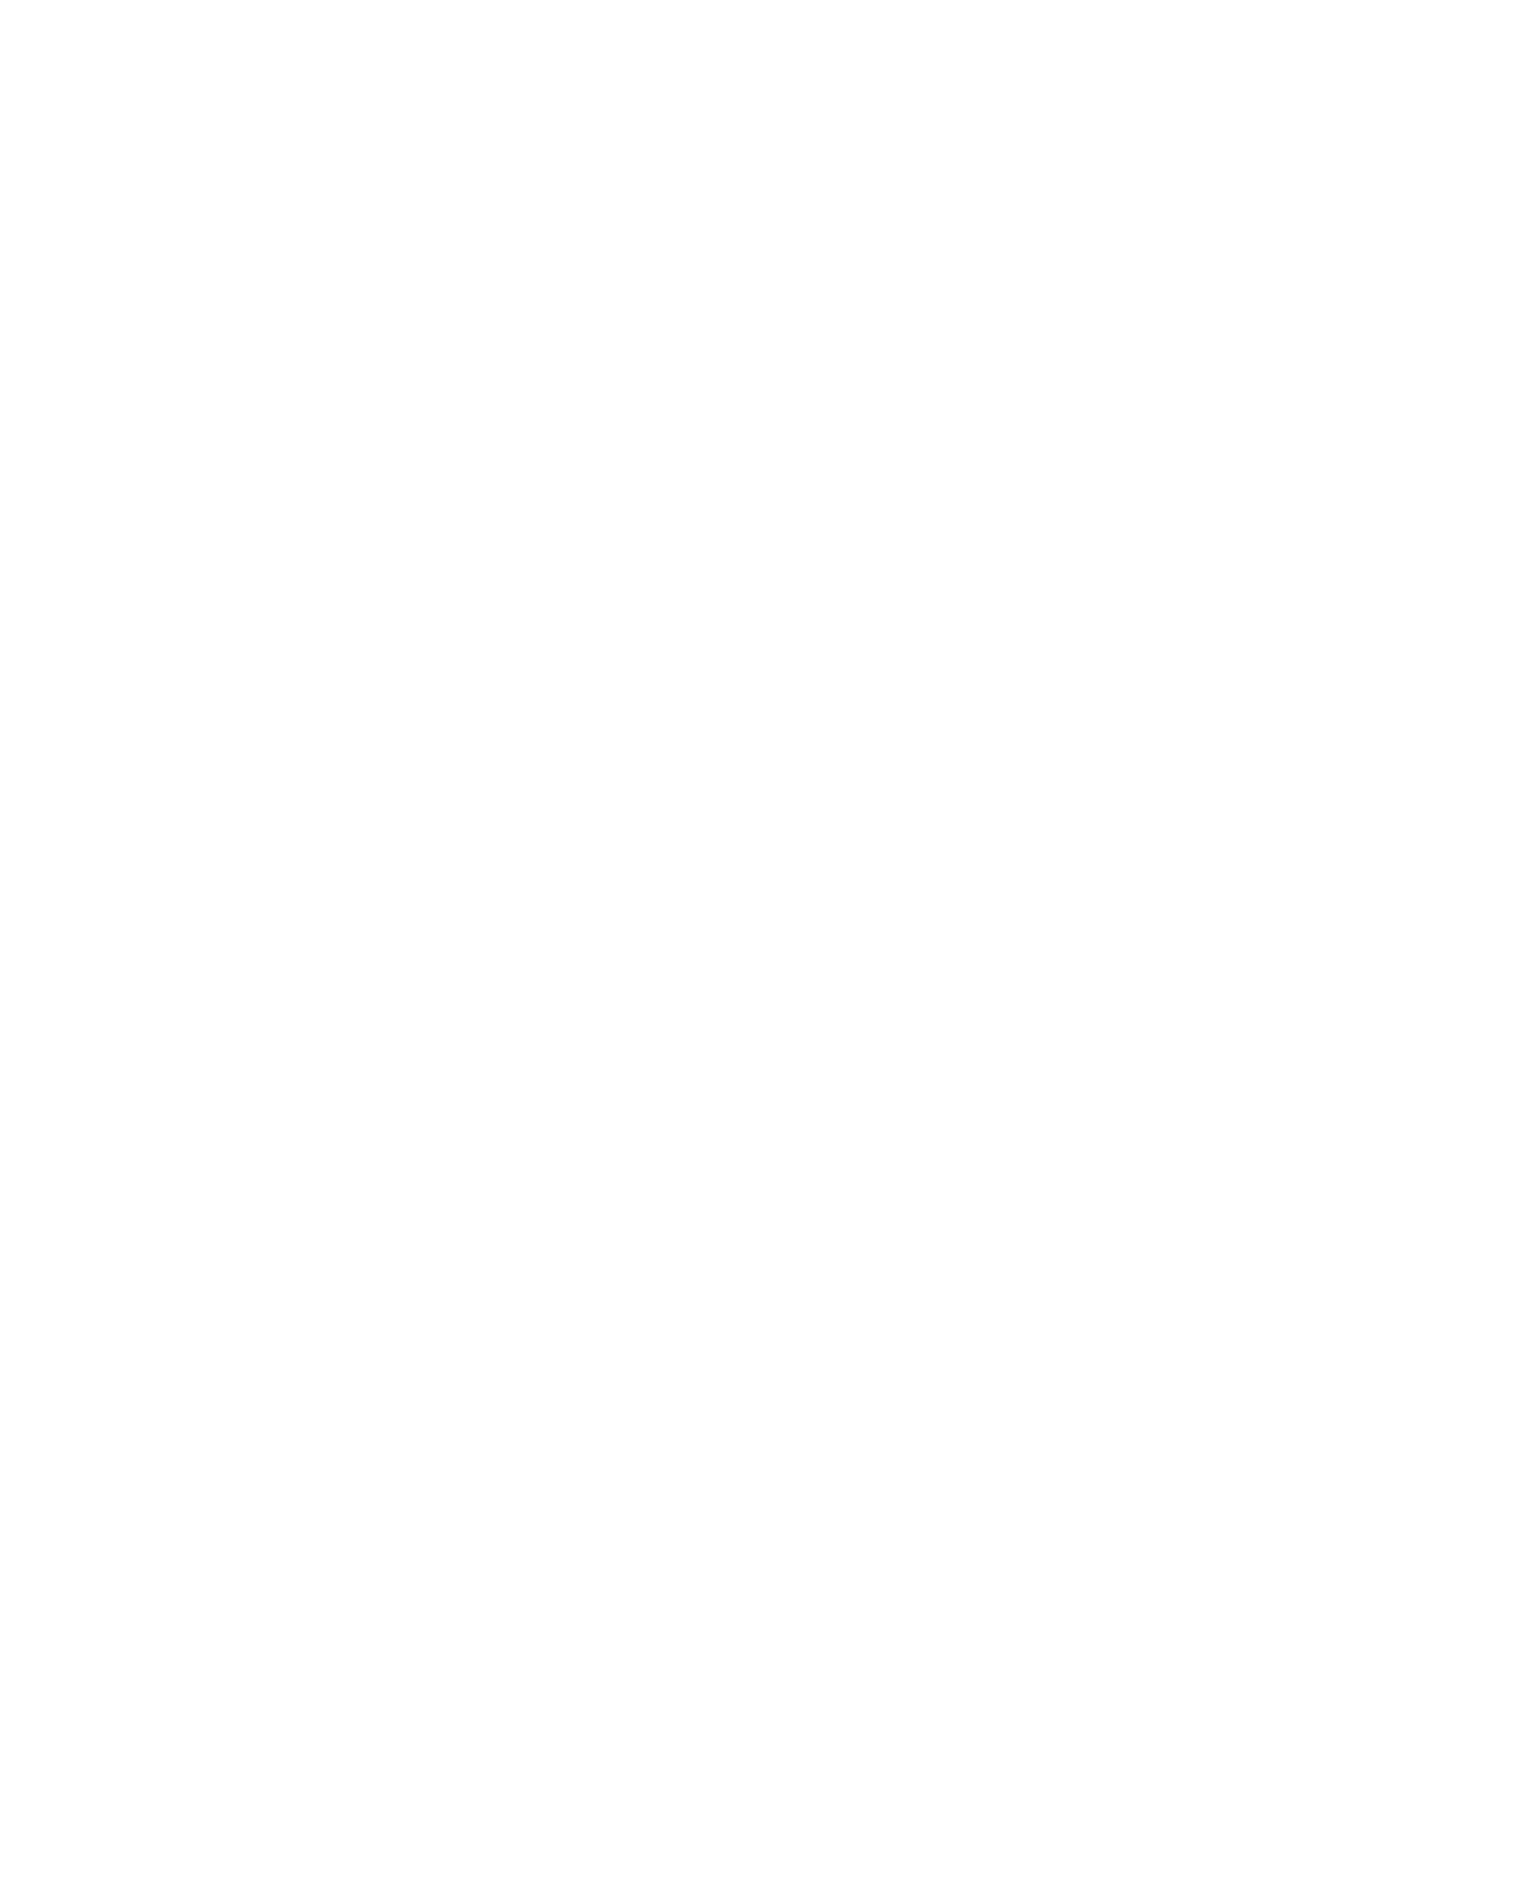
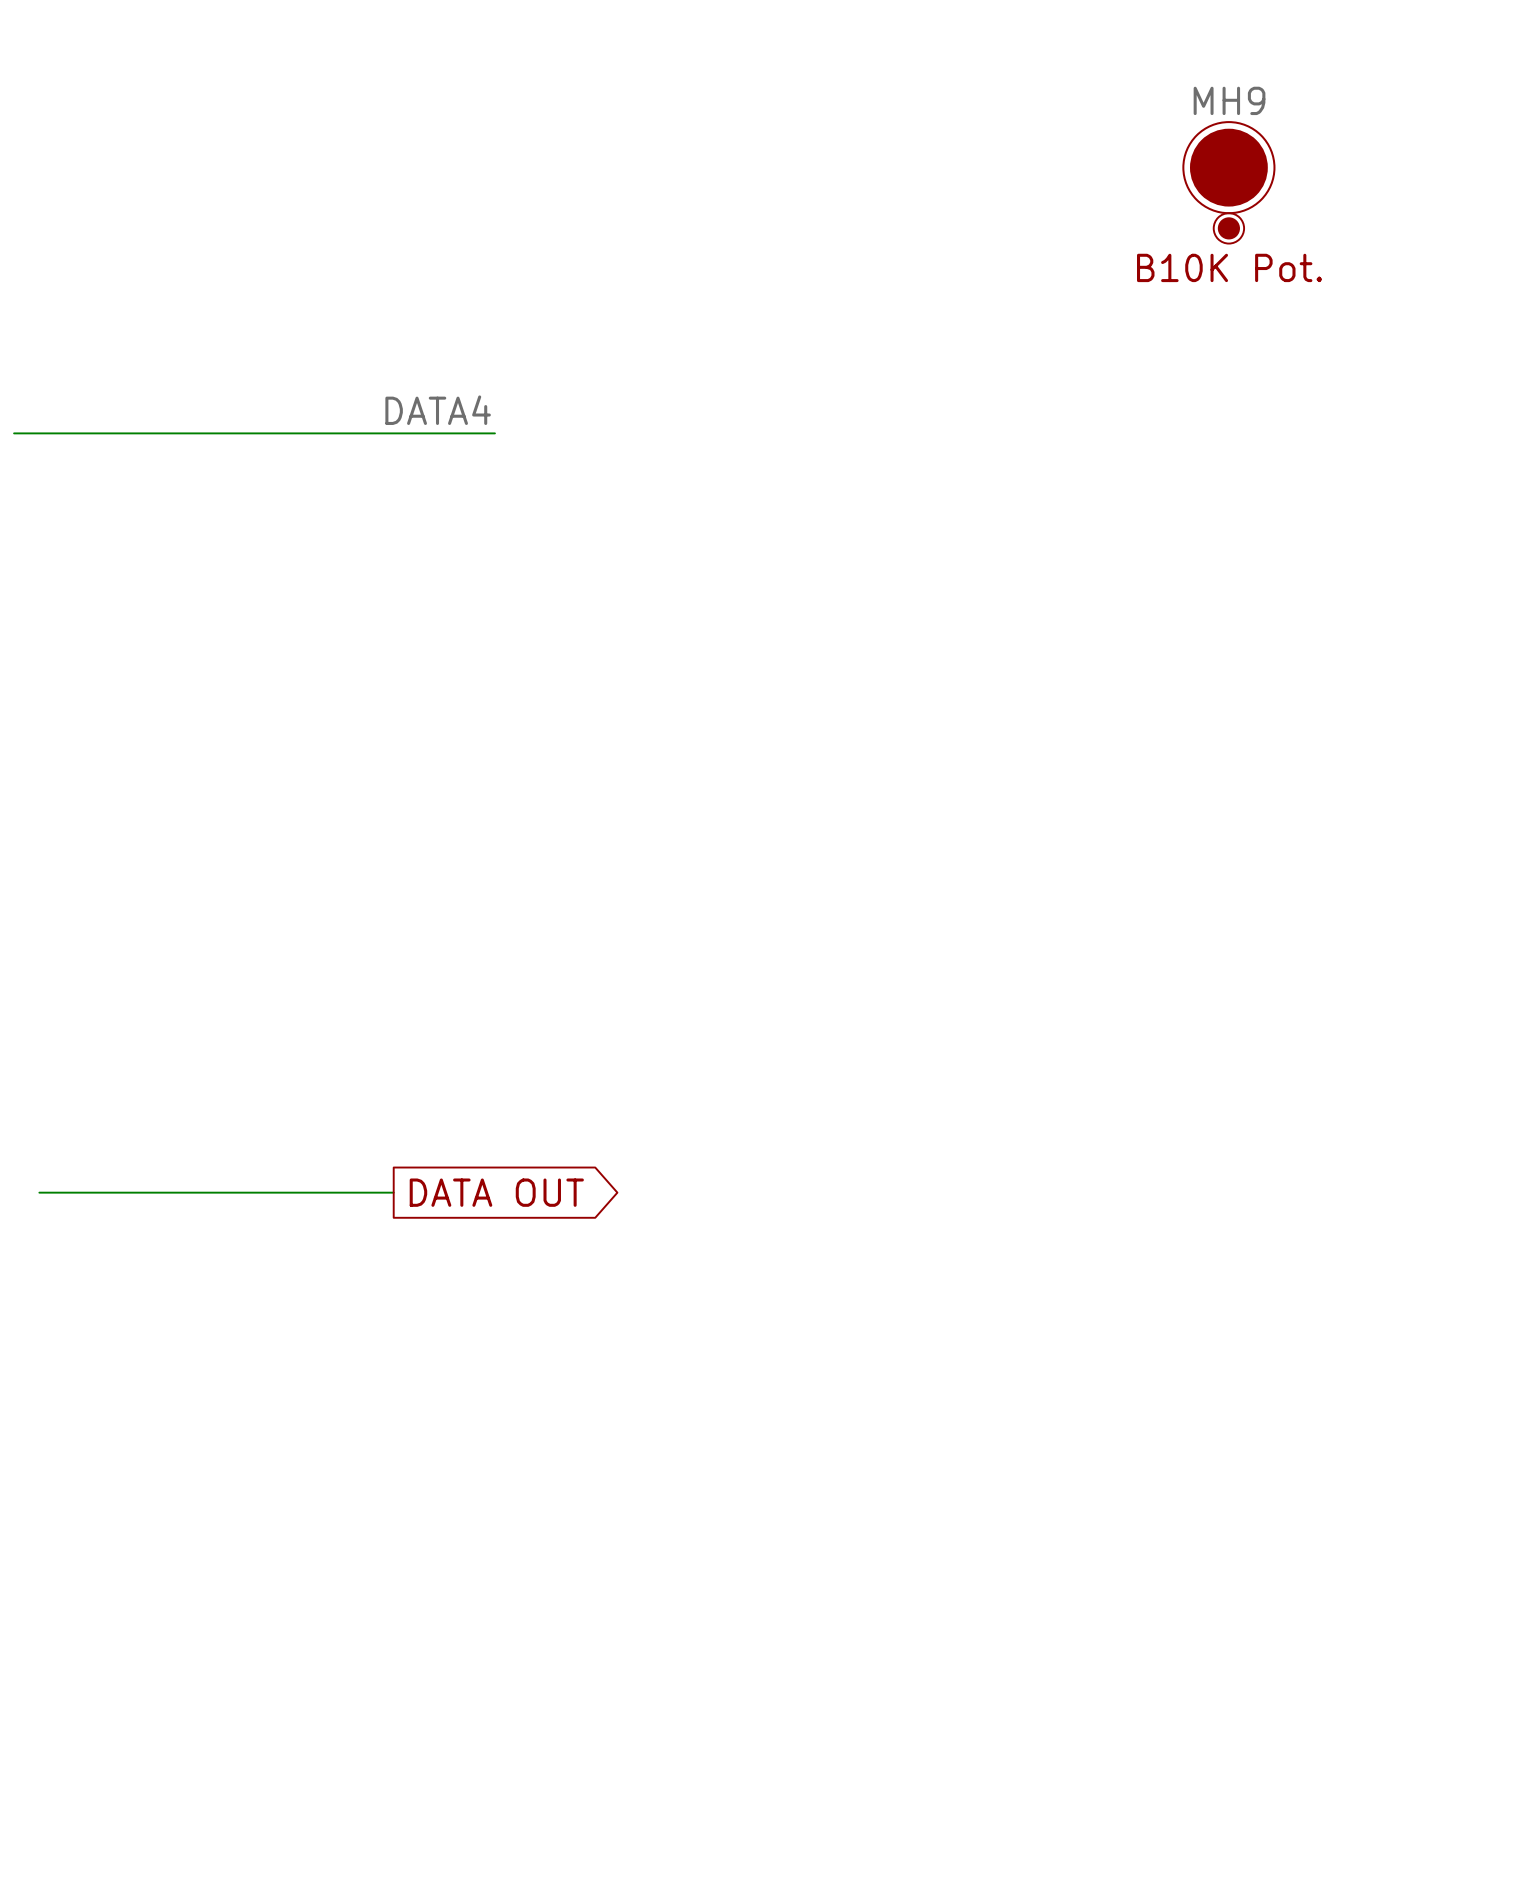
MH9: none -> (1228, 182)
label: none -> DATA4 (438, 410)
wire: none -> (14, 433) (494, 433)
wire: none -> (39, 1192) (393, 1192)
global label: none -> DATA OUT (496, 1192)

